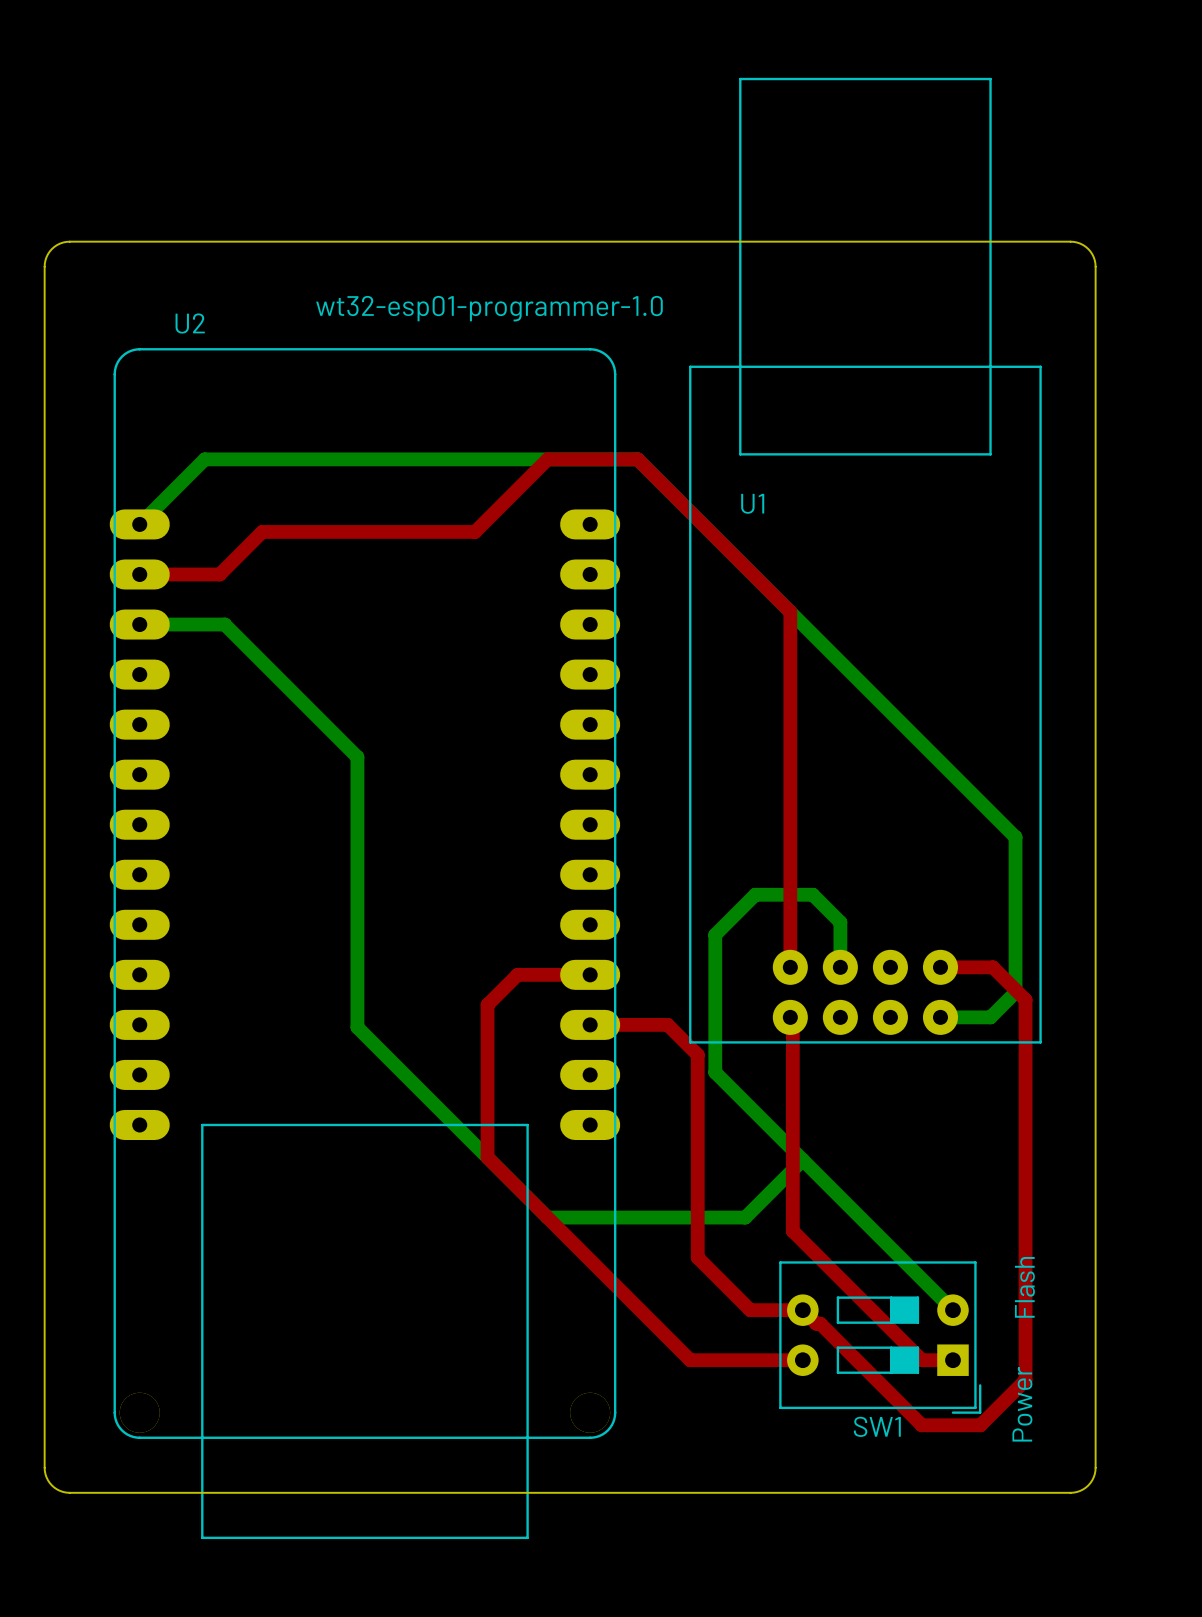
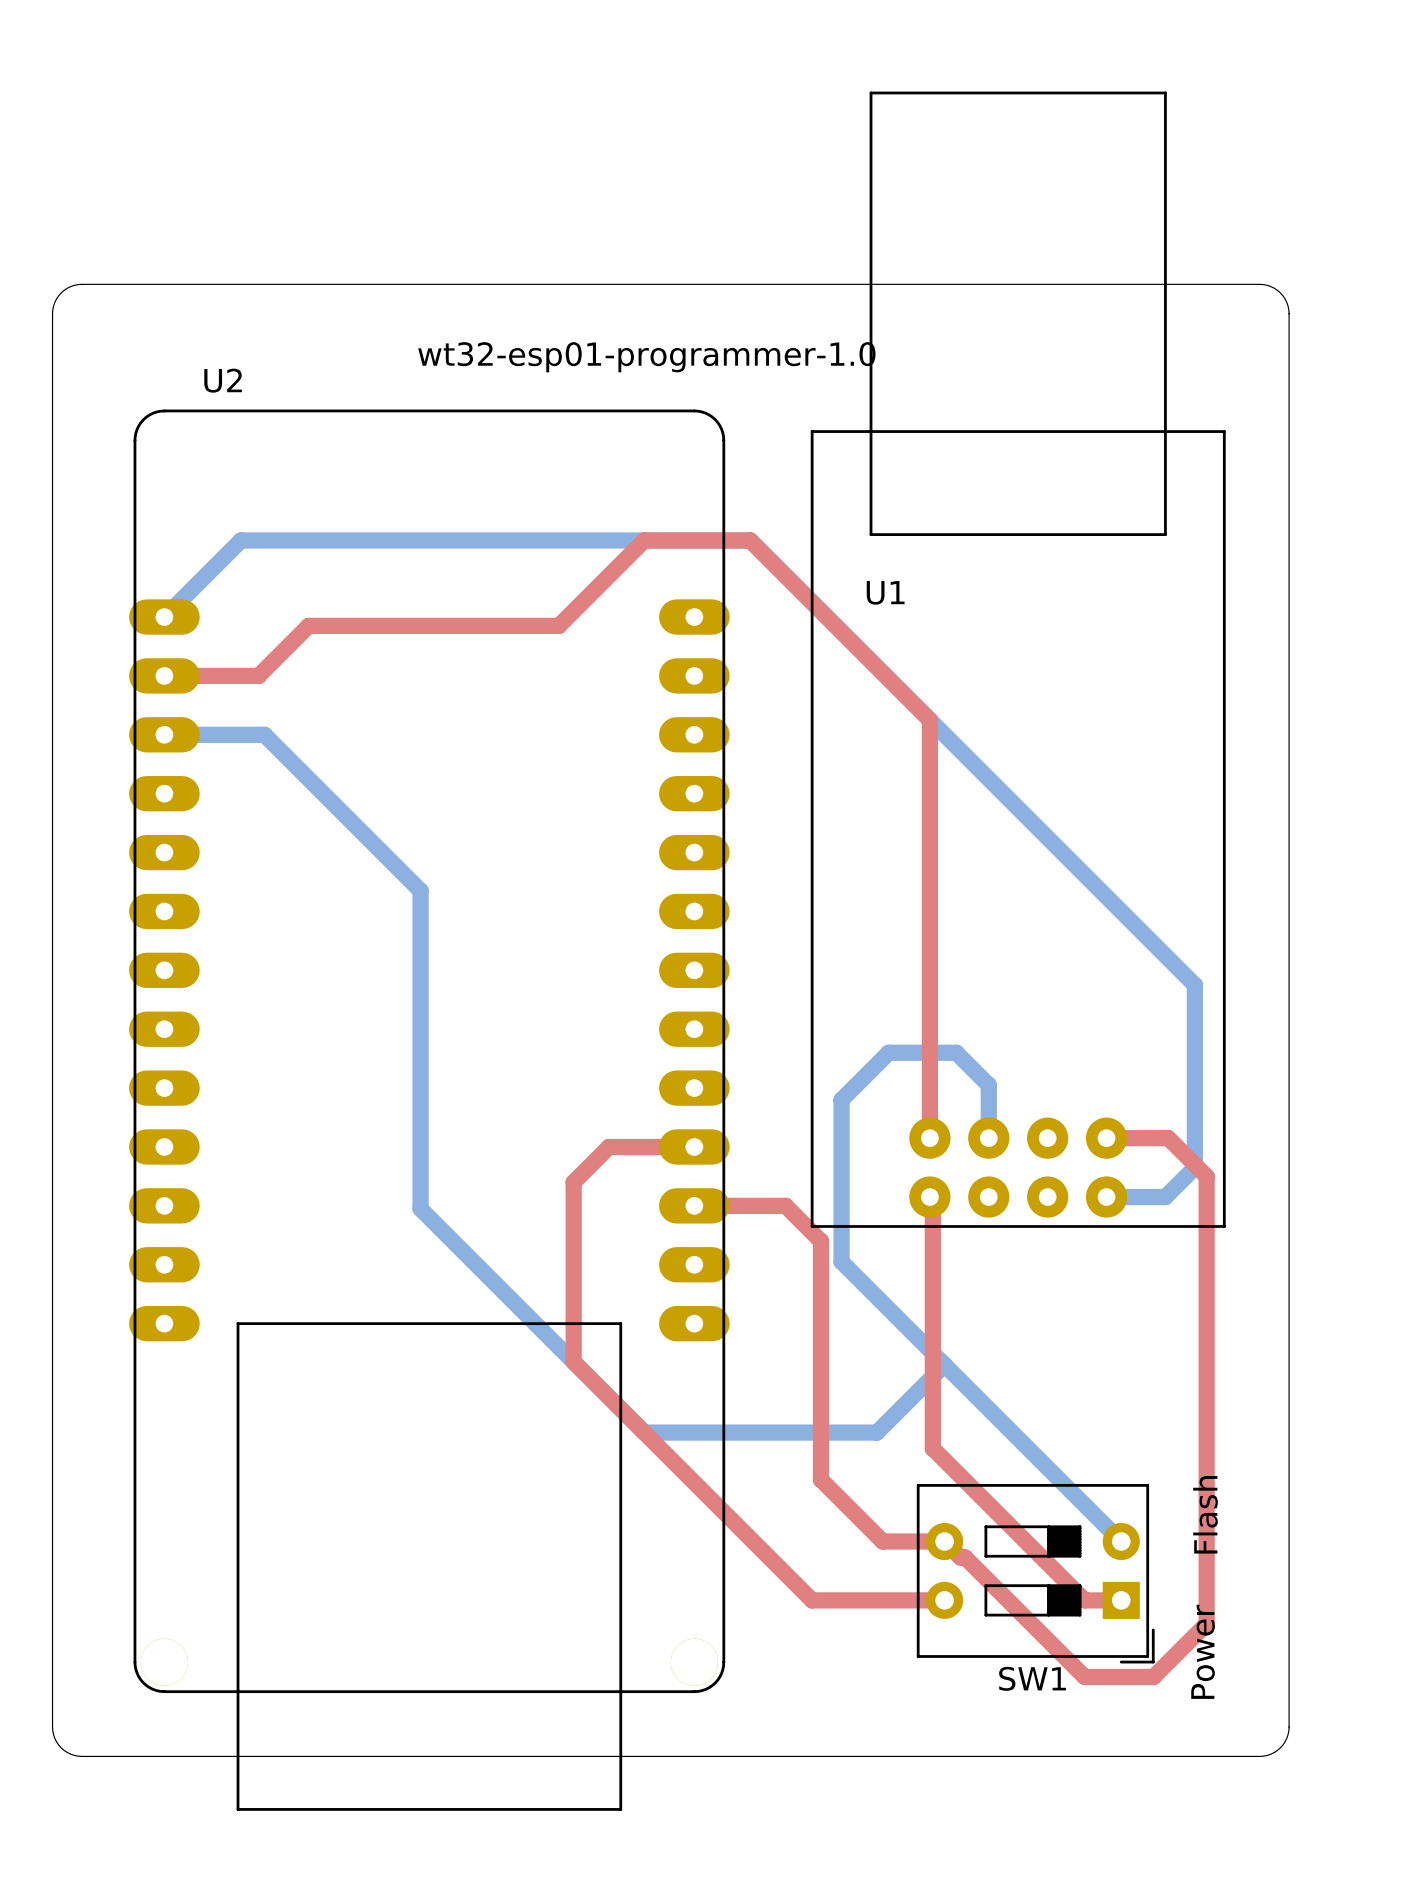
text position: wt32-esp01-programmer-1.0 (489, 308) -> wt32-esp01-programmer-1.0 (646, 357)

